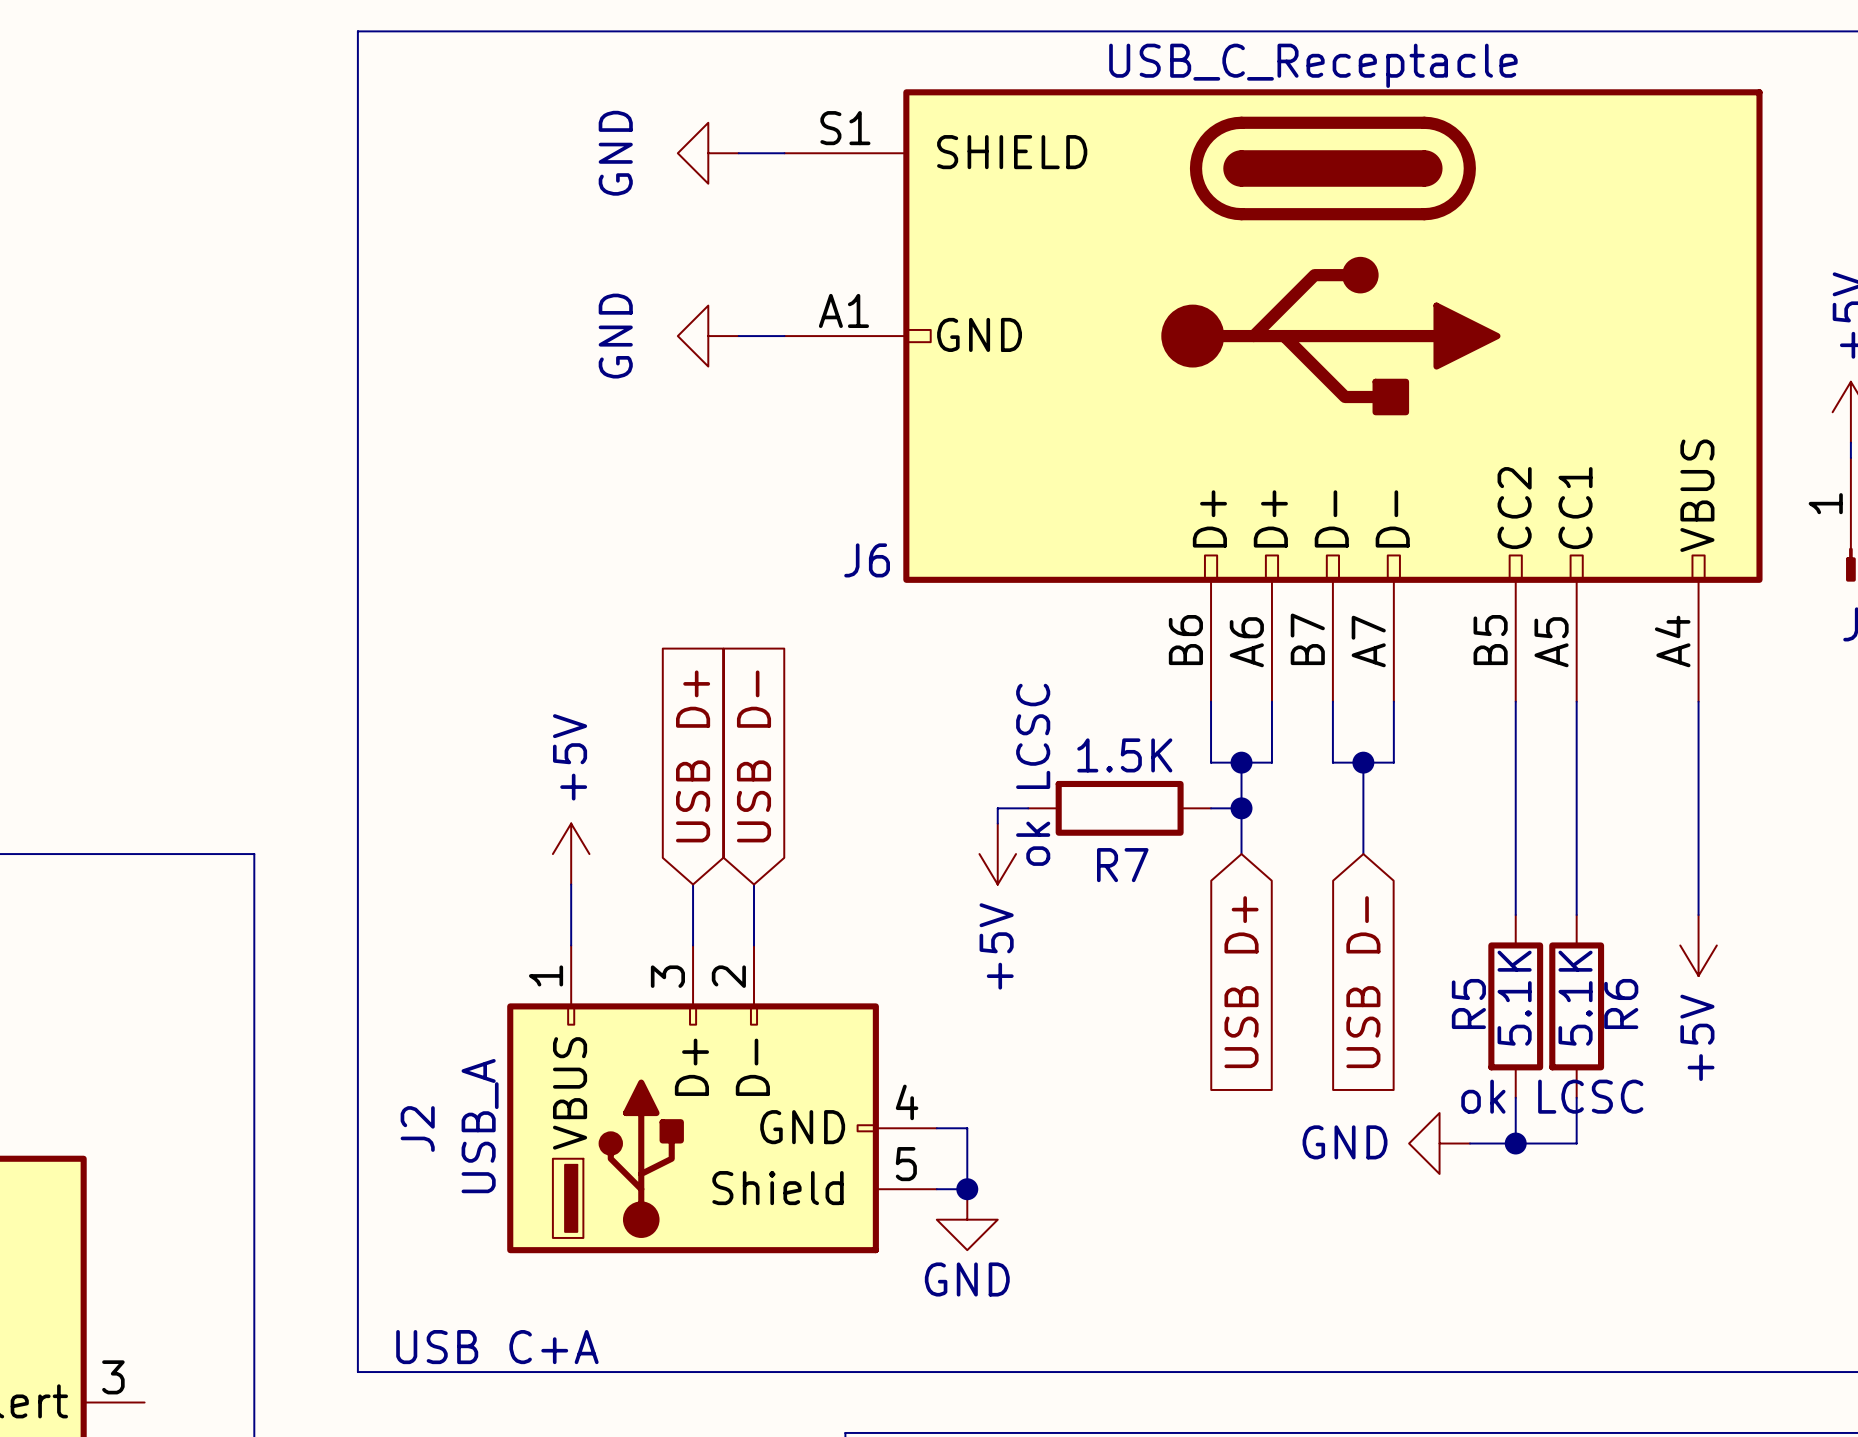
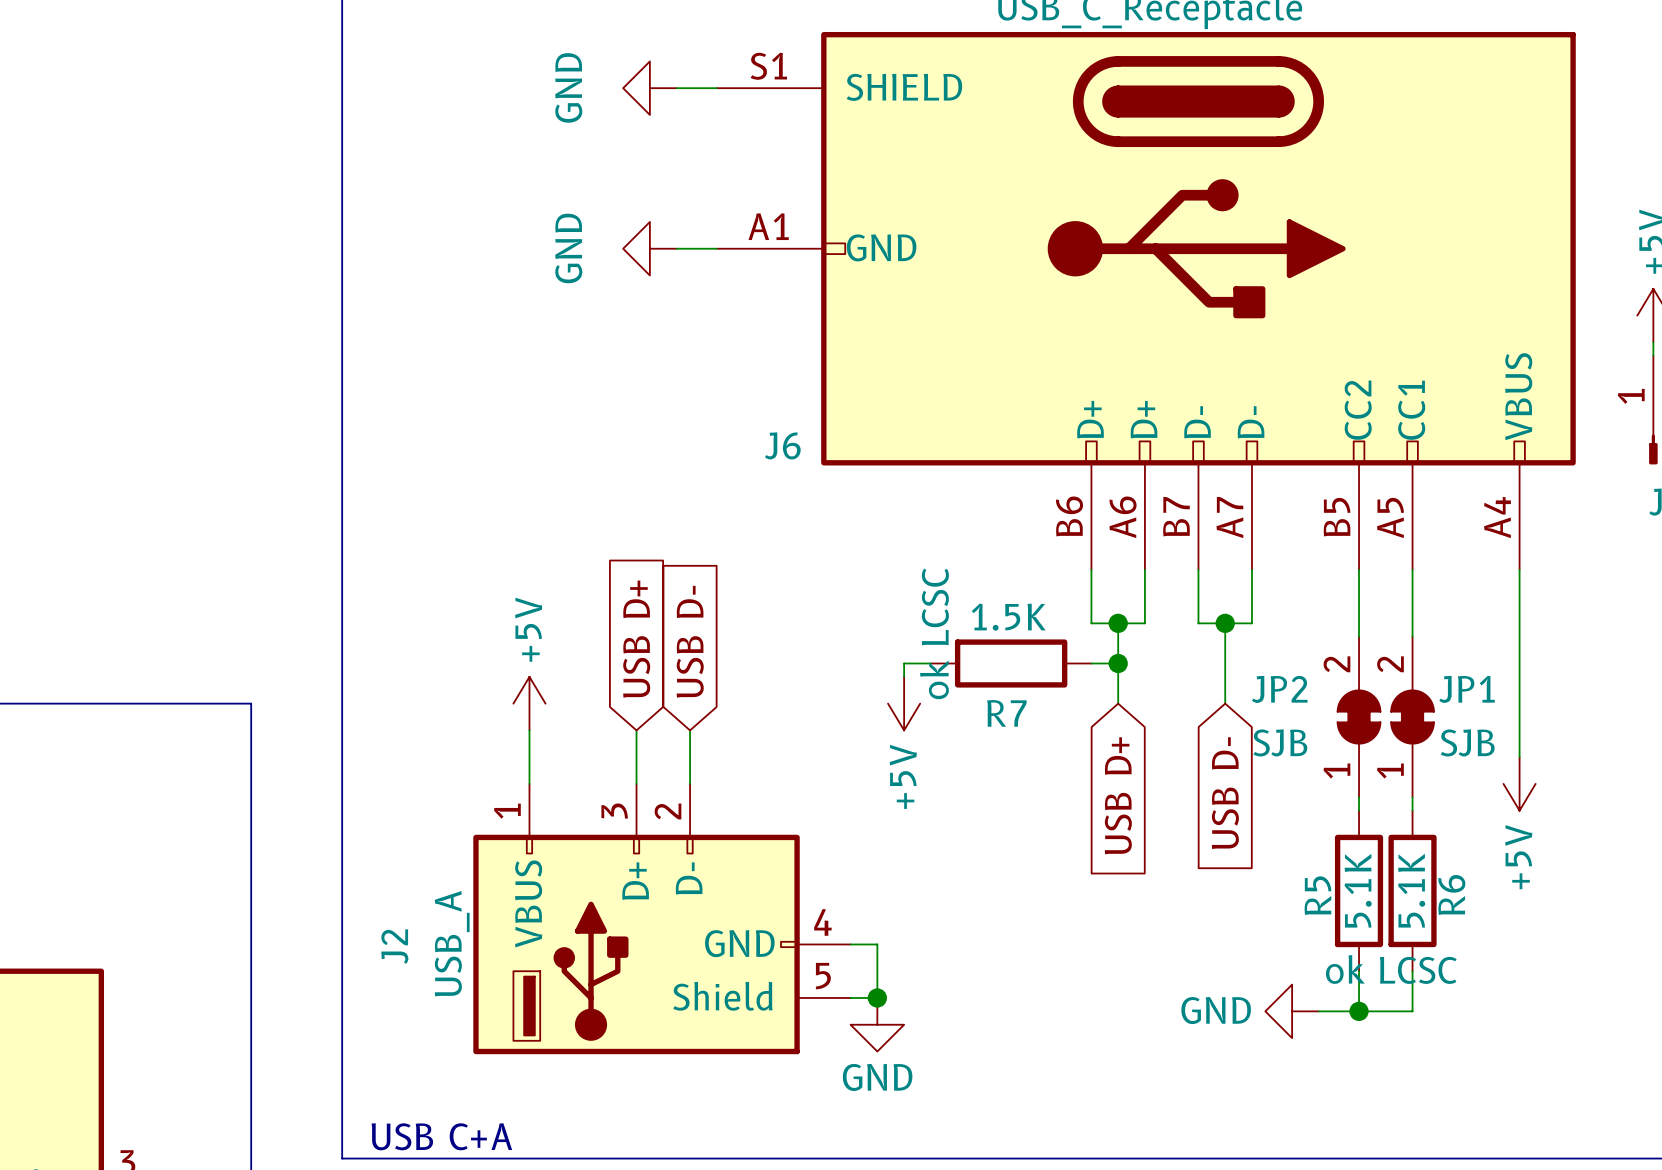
JP2: none -> SJB (1359, 717)
JP1: none -> SJB (1412, 717)
wire: none -> (1359, 797) (1359, 810)
wire: none -> (1412, 797) (1412, 810)
R5 position: (1515, 1006) -> (1359, 890)
R6 position: (1576, 1006) -> (1412, 890)
wire: (1515, 1097) (1515, 1143) -> (1359, 971) (1359, 1011)
wire: (1576, 1097) (1576, 1143) (1470, 1143) -> (1412, 971) (1412, 1011) (1318, 1011)
power symbol position: GND (1439, 1143) -> GND (1292, 1011)
junction position: (1515, 1143) -> (1359, 1011)

